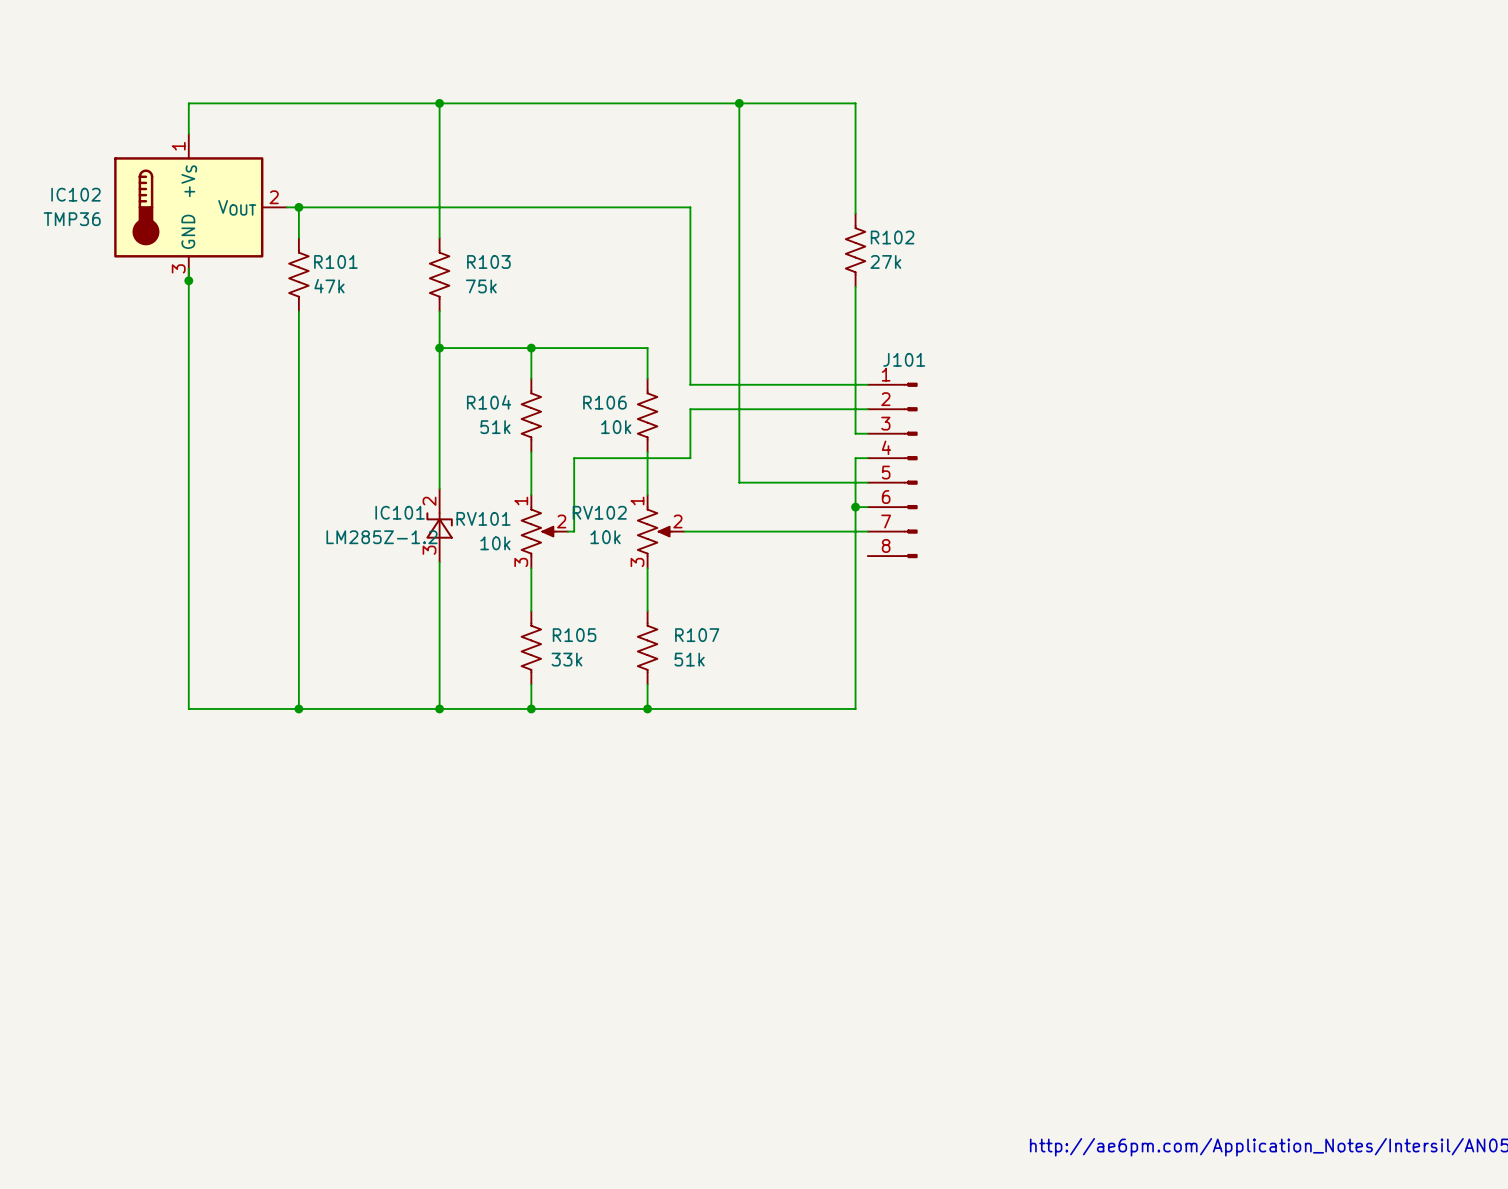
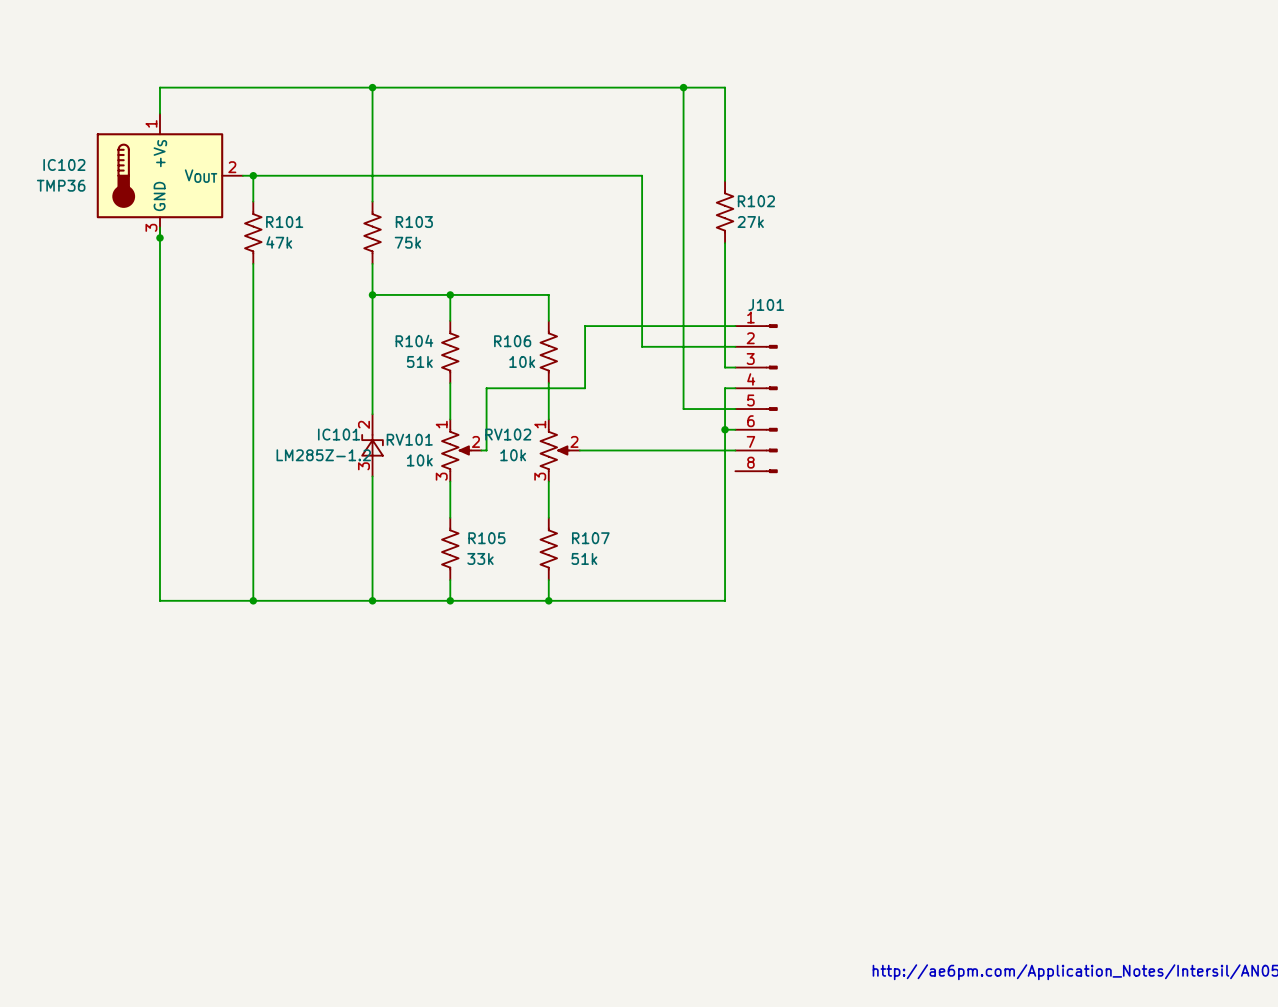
wire: (739, 103) (739, 482) (806, 482) -> (683, 87) (683, 409)
junction: (739, 103) -> none
junction: none -> (683, 87)
wire: (690, 207) (690, 384) -> (585, 175) (642, 175) (642, 346)
wire: (690, 409) (757, 409) -> (585, 346) (585, 326)

